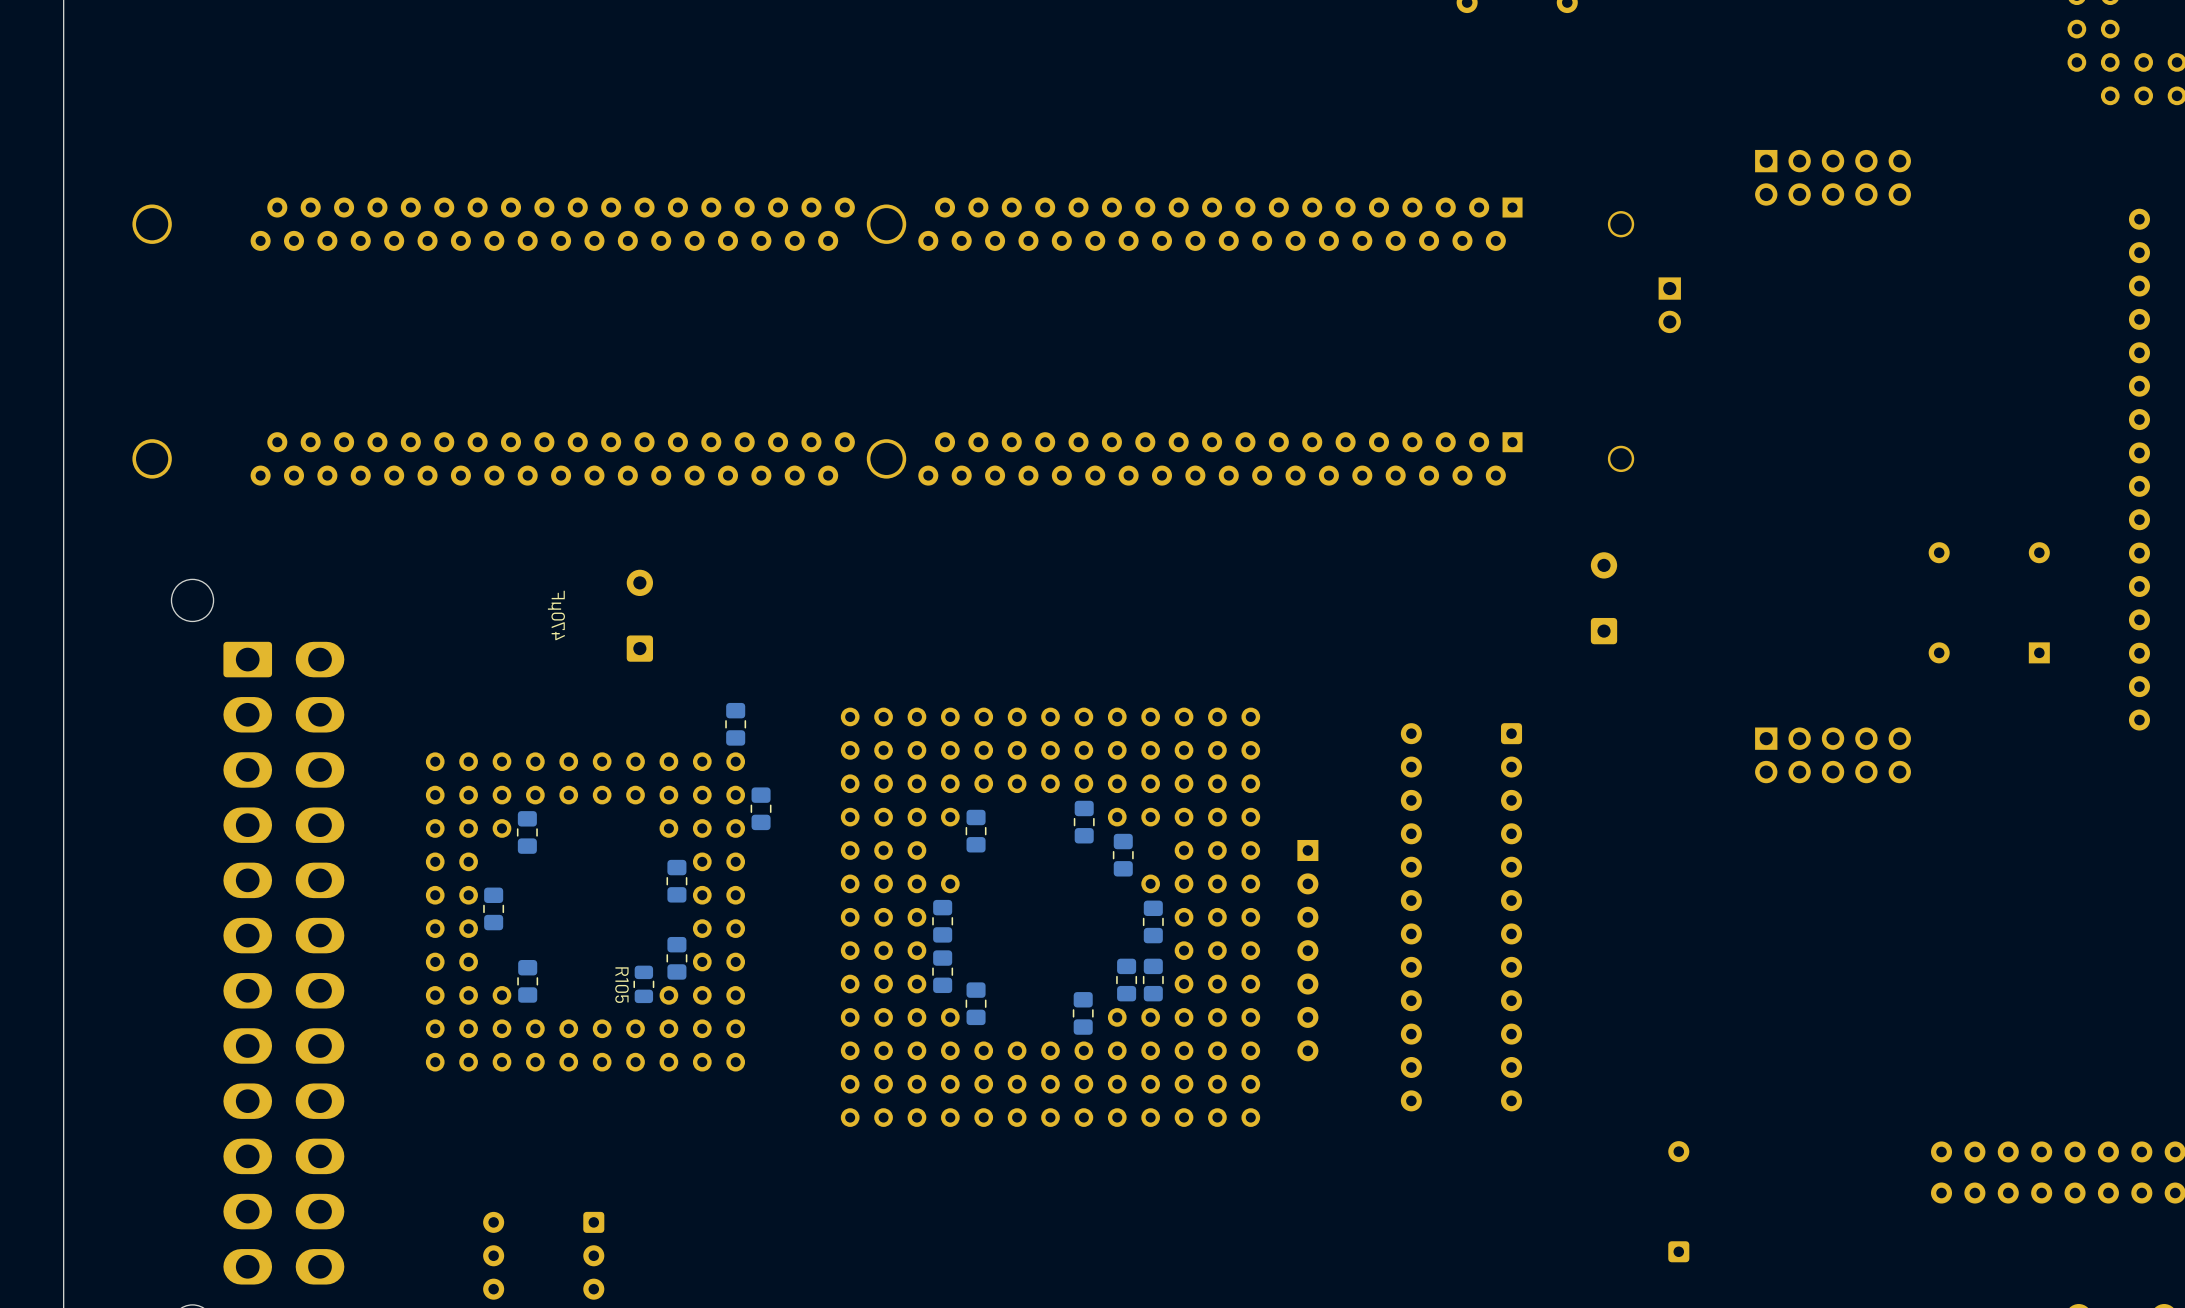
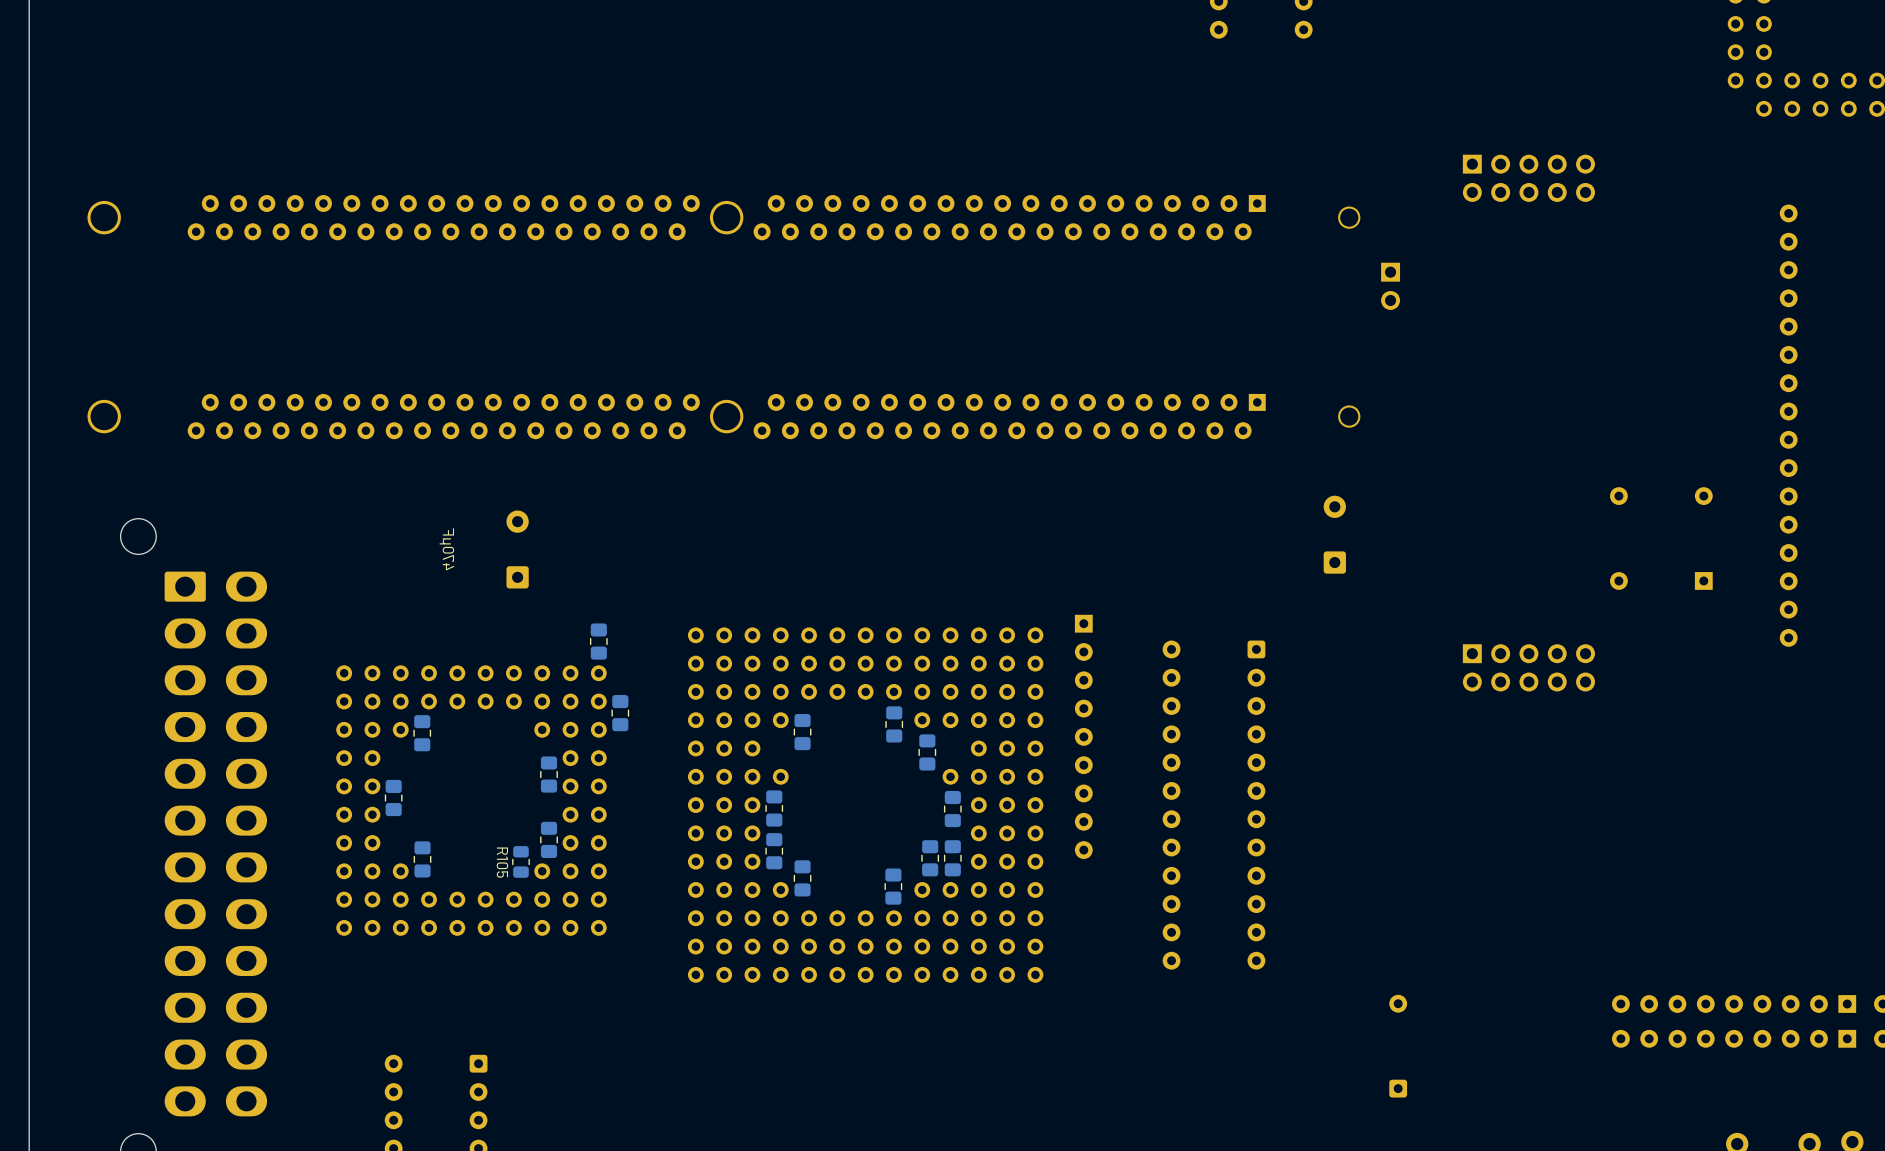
part: none -> (1083, 736)
part: (1307, 950) -> none

